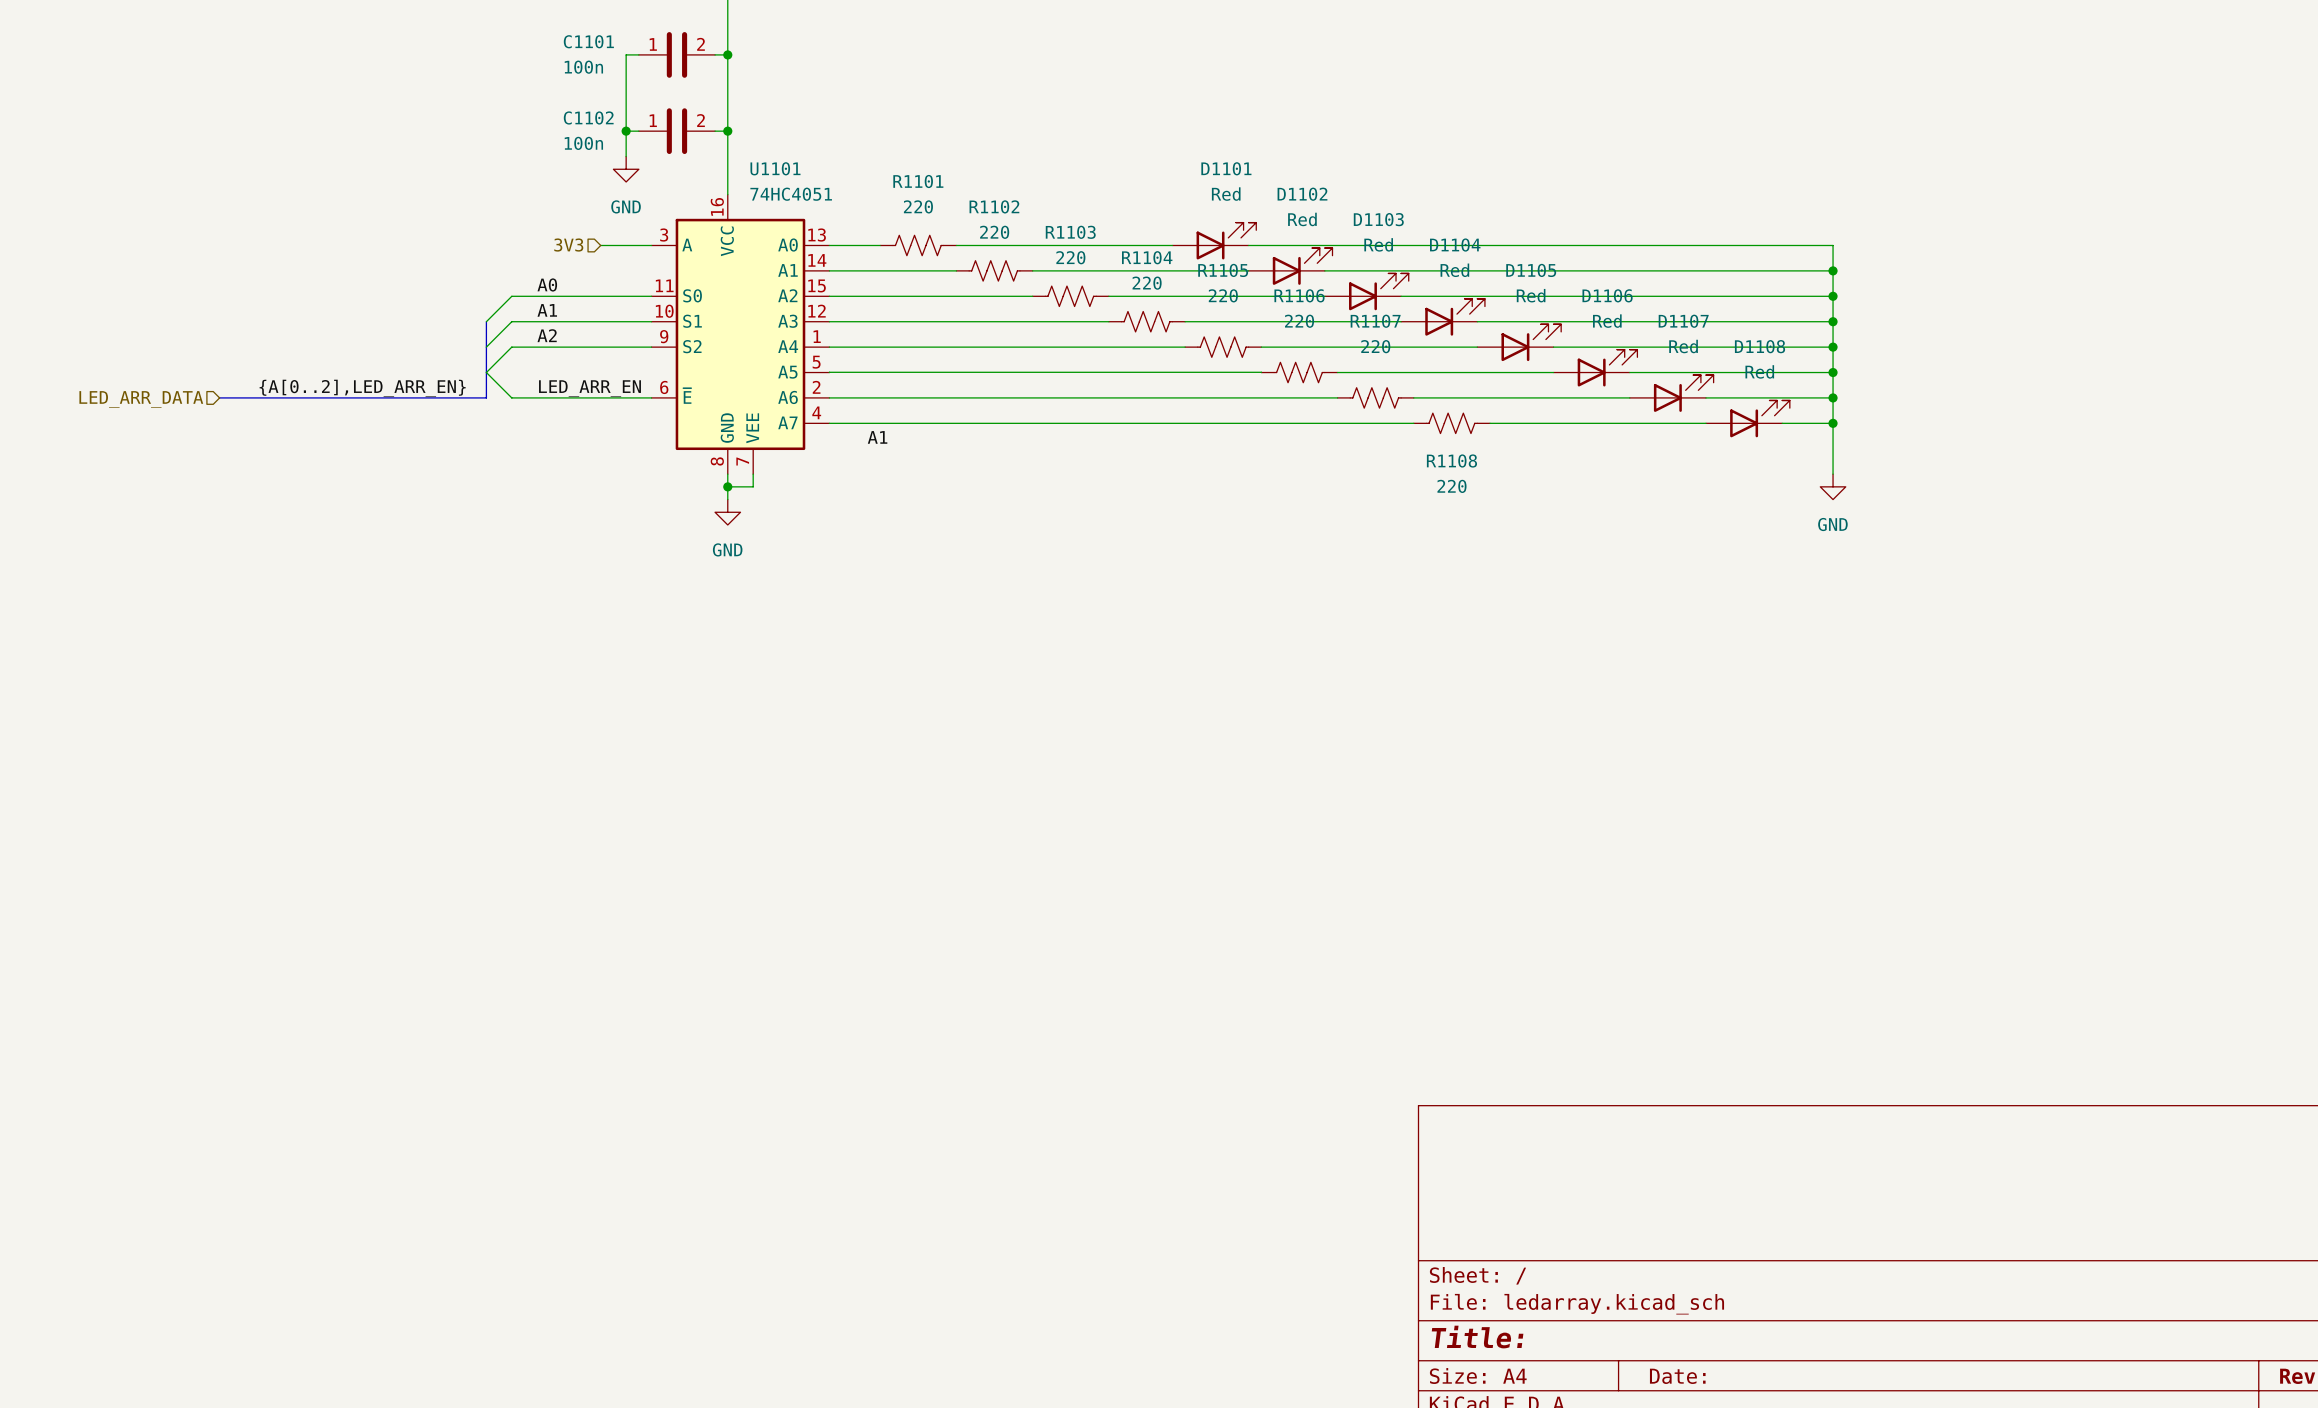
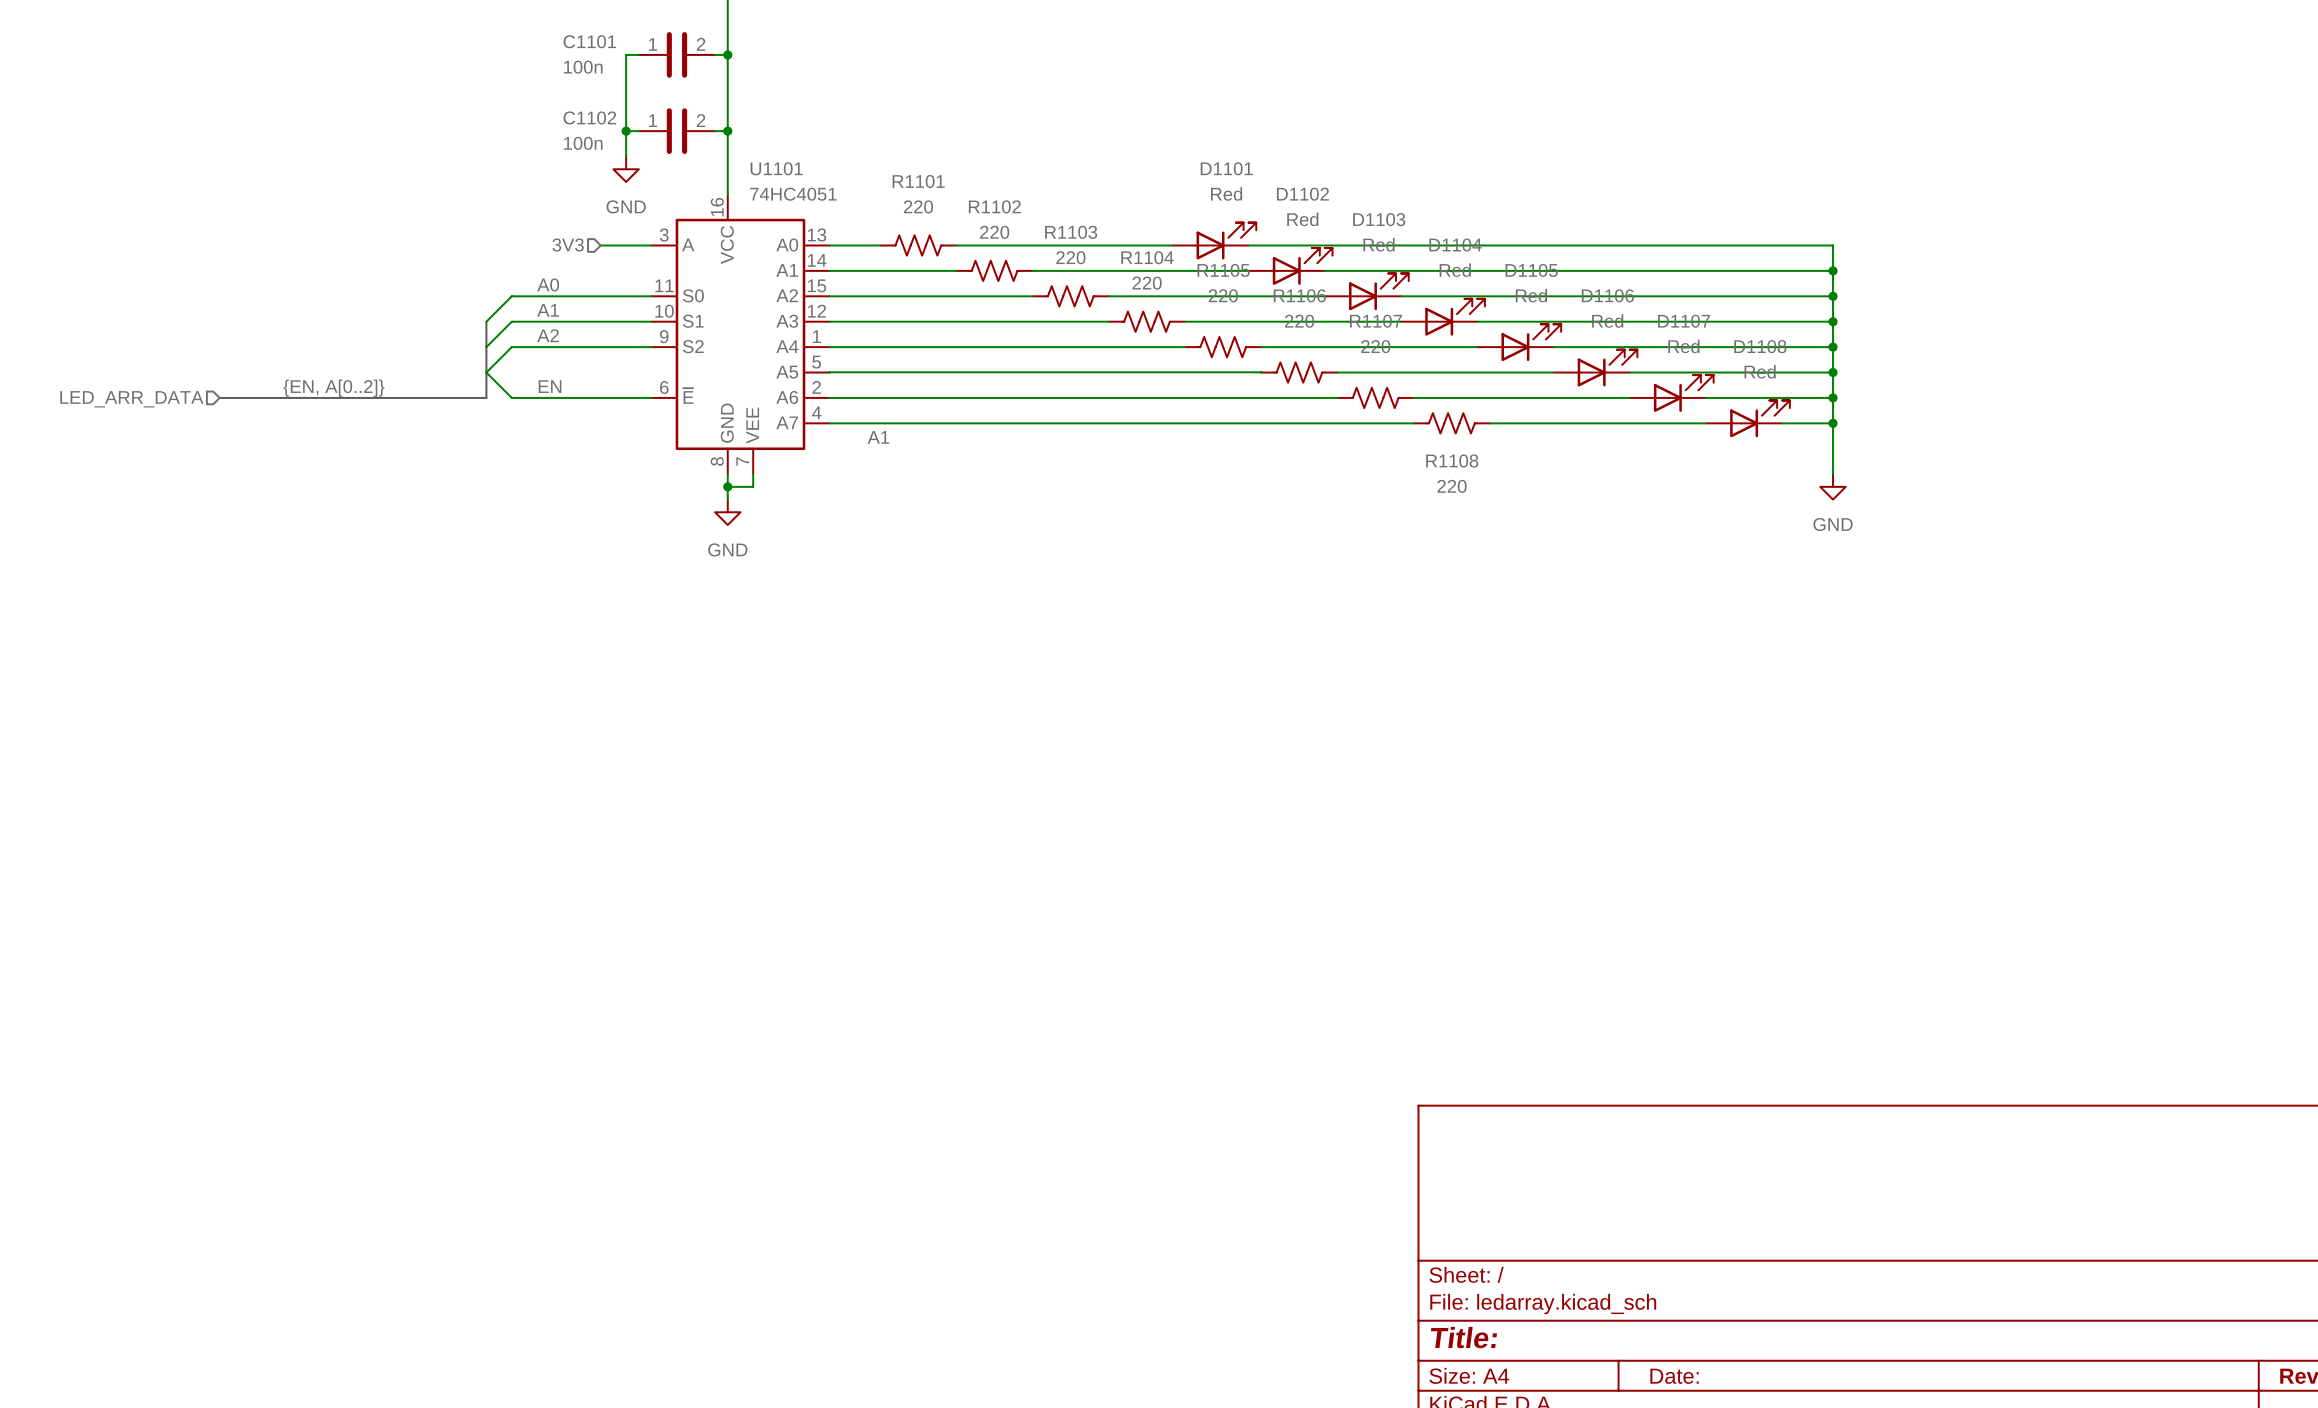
label: none -> {EN, A[0..2]} (333, 388)
label: {A[0..2],LED_ARR_EN} (362, 388) -> none
label: LED_ARR_EN (589, 388) -> EN (550, 386)

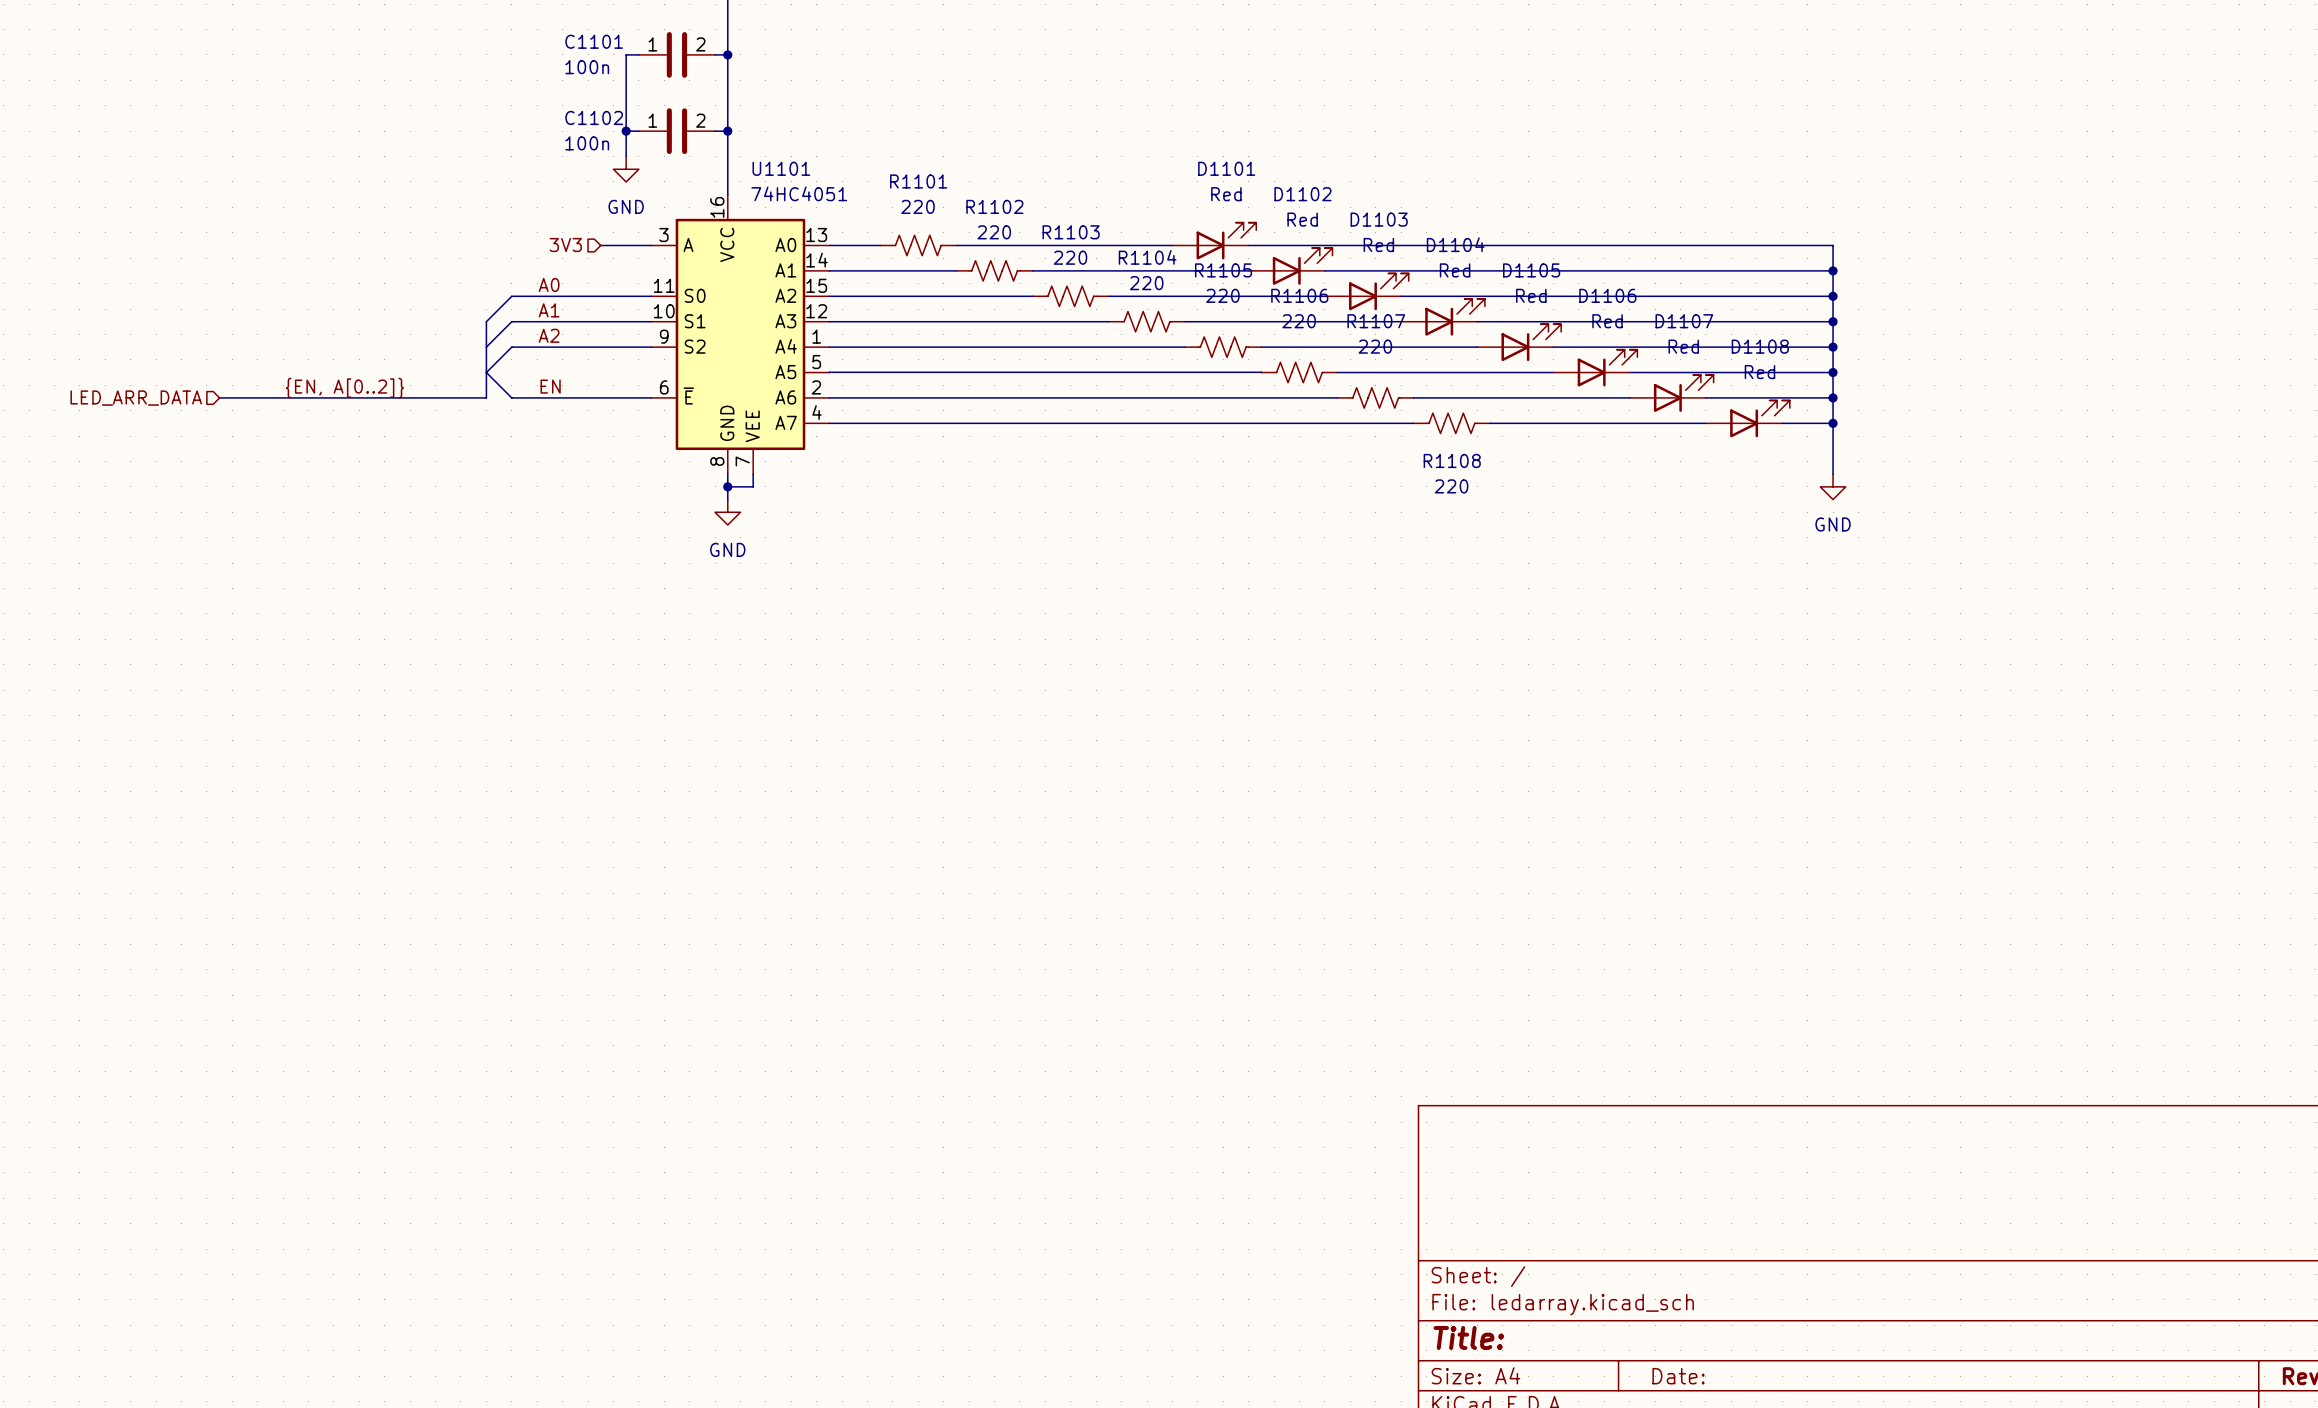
label: A1 (878, 437) -> none

